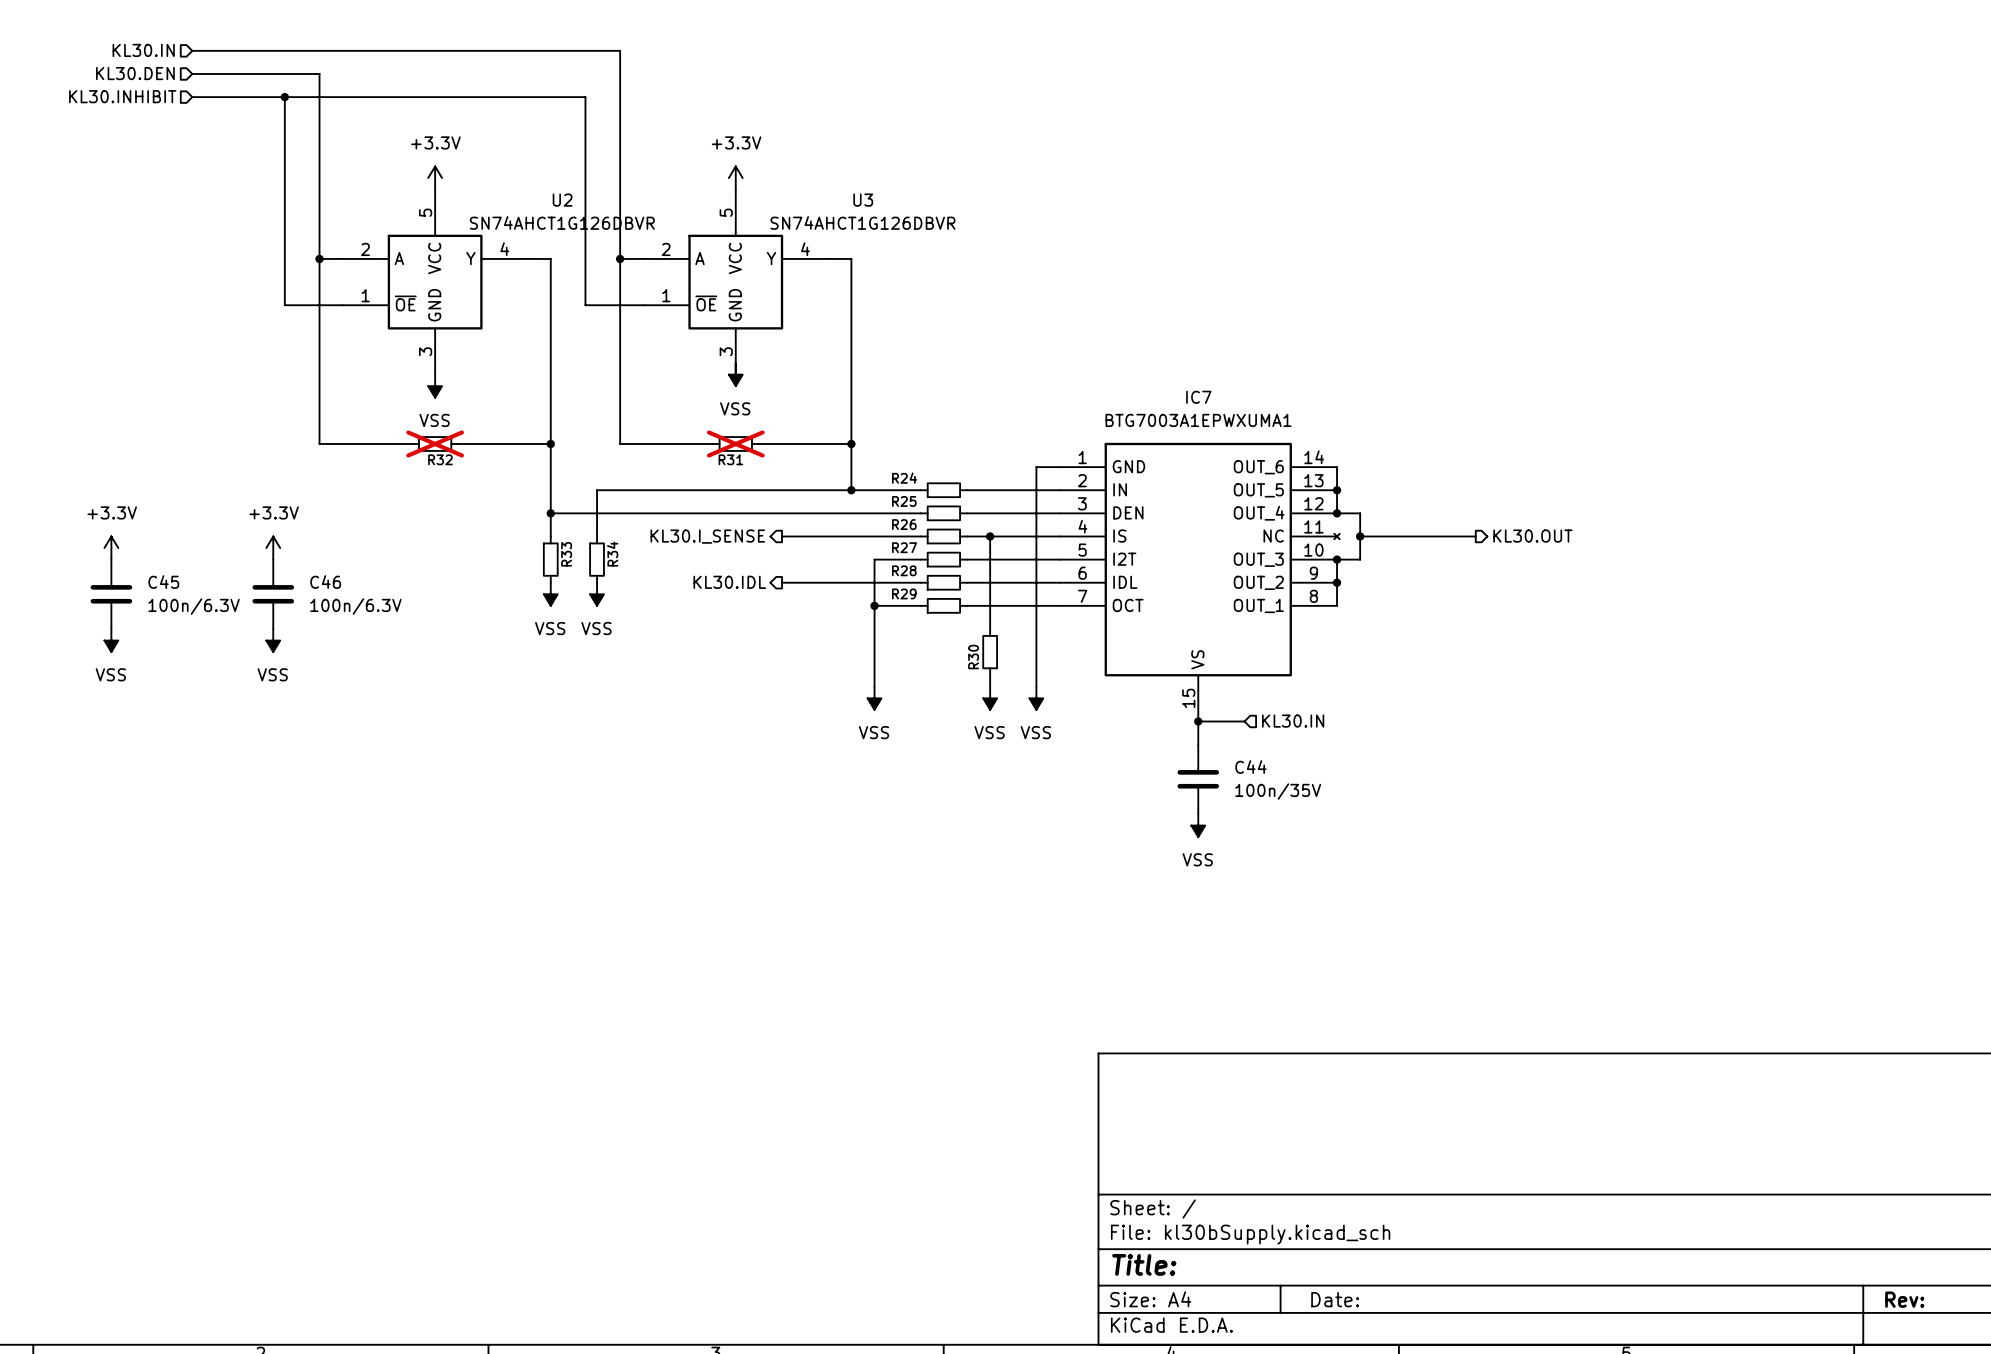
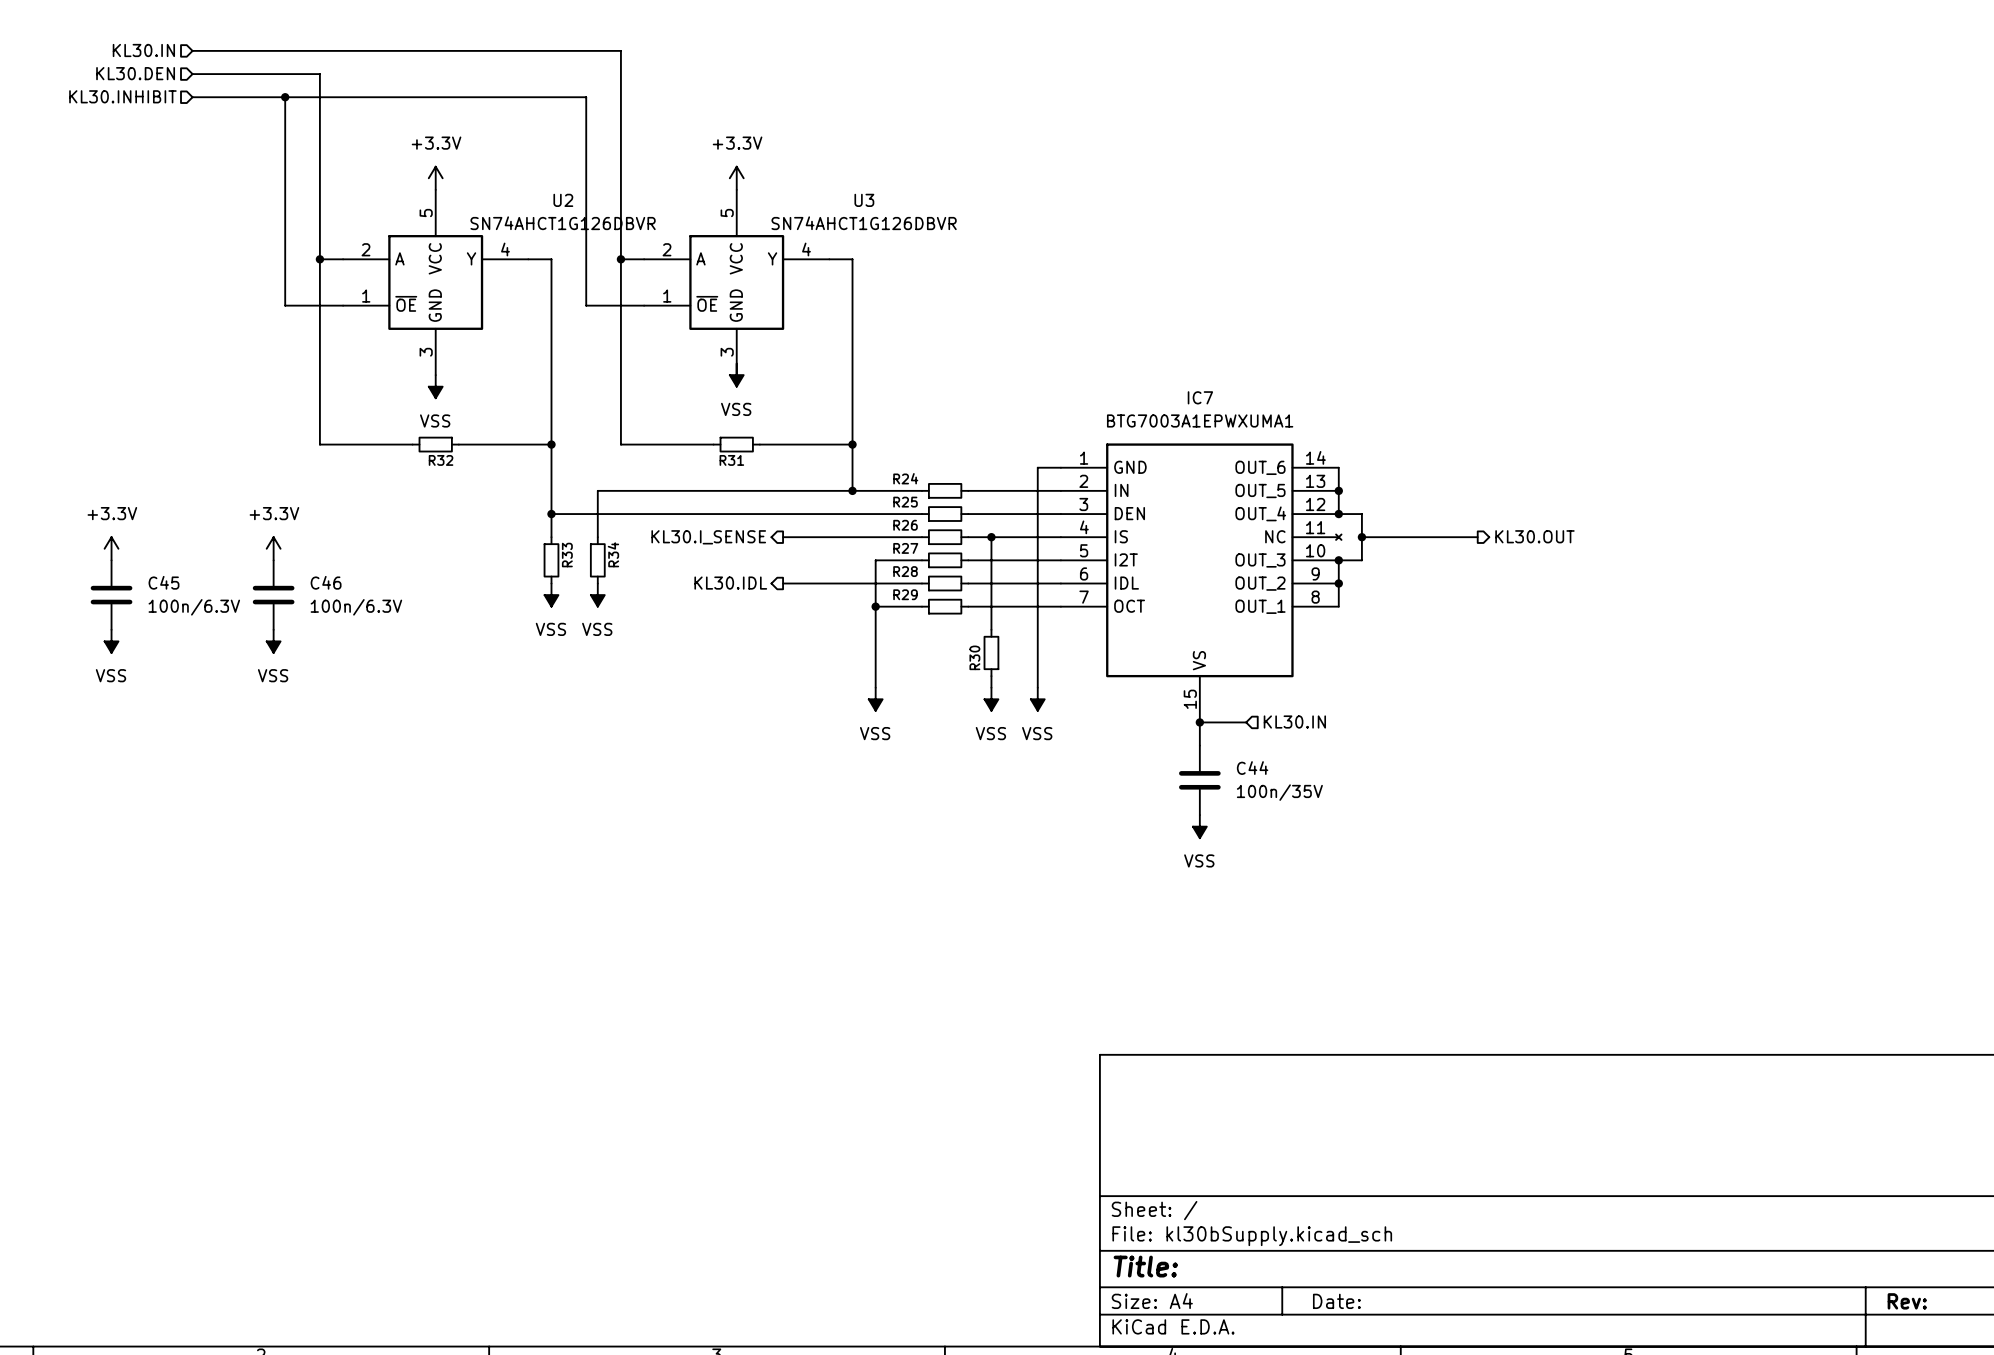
R32 do-not-place cross: (435, 443) -> none
R31 do-not-place cross: (735, 443) -> none

